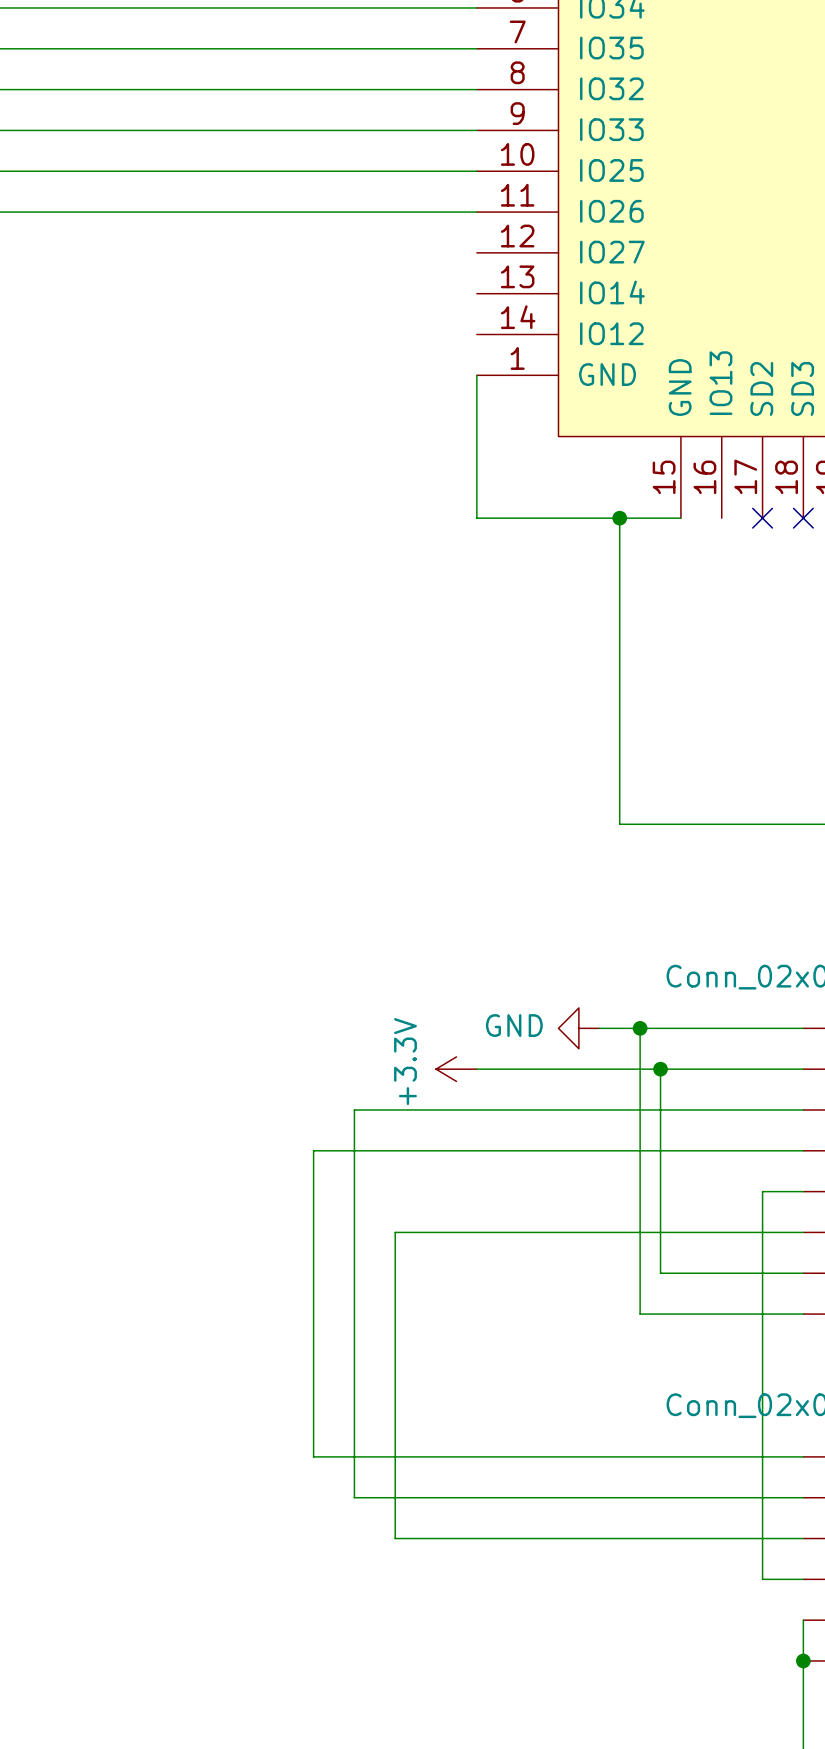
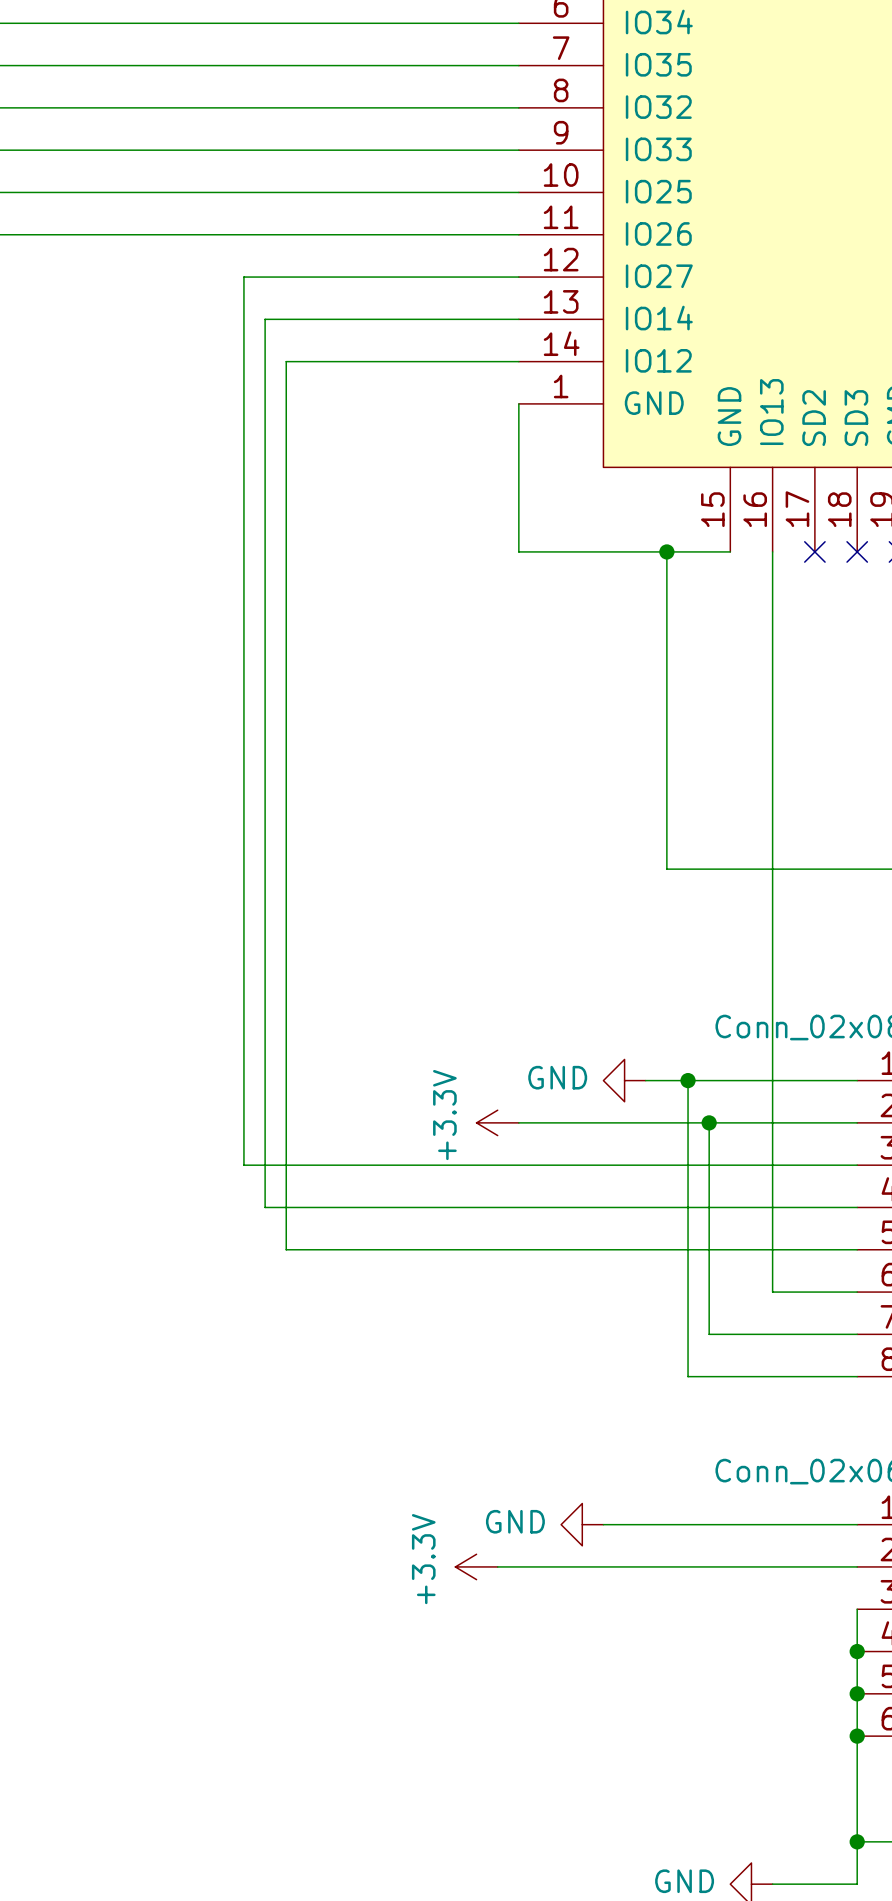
wire: none -> (772, 551) (772, 1292)
wire: (354, 1109) (354, 1497) (456, 1497) -> (391, 1165) (243, 1165) (243, 277) (518, 277)
wire: (313, 1150) (313, 1456) (558, 1456) -> (349, 1207) (265, 1207) (265, 319) (518, 319)
wire: (762, 1191) (762, 1579) (803, 1579) -> (814, 1249) (286, 1249) (286, 361) (518, 361)
wire: (721, 1232) (395, 1232) (395, 1538) (803, 1538) -> (857, 1693) (857, 1609)
power symbol: none -> GND (582, 1524)
power symbol: none -> +3.3V (476, 1566)
junction: none -> (857, 1651)
junction: none -> (857, 1693)

